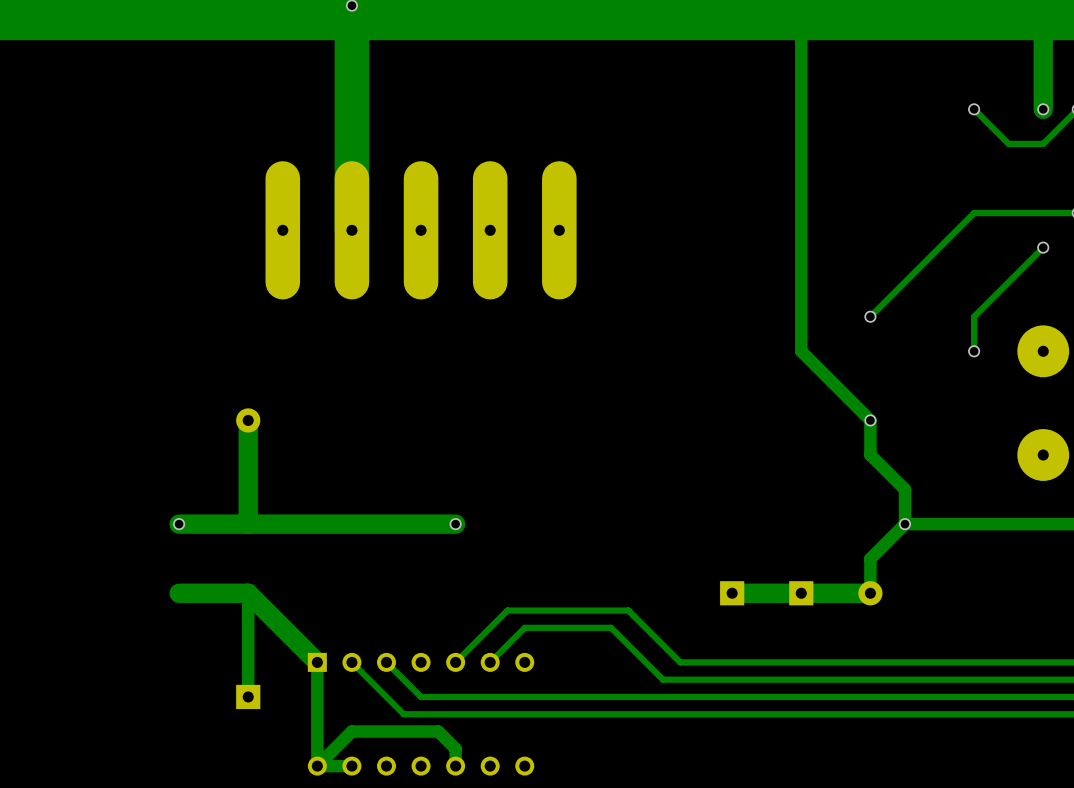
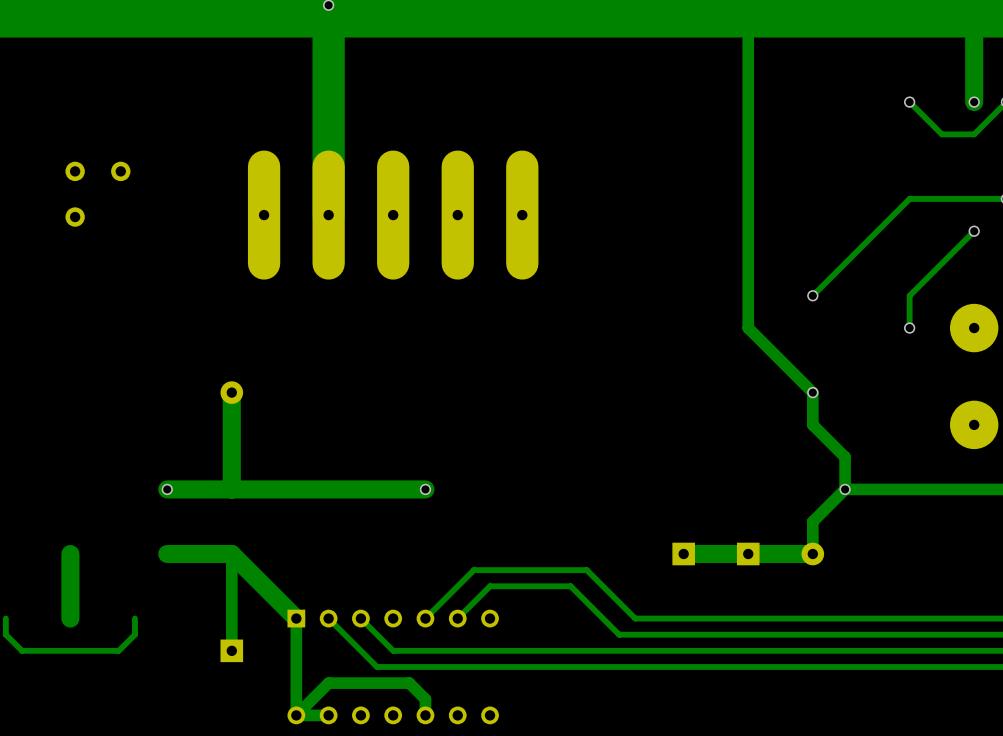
part: none -> (97, 194)
track: none -> (70, 554) (70, 618)
track: none -> (134, 618) (134, 634) (118, 650) (21, 650) (5, 634) (5, 618)

